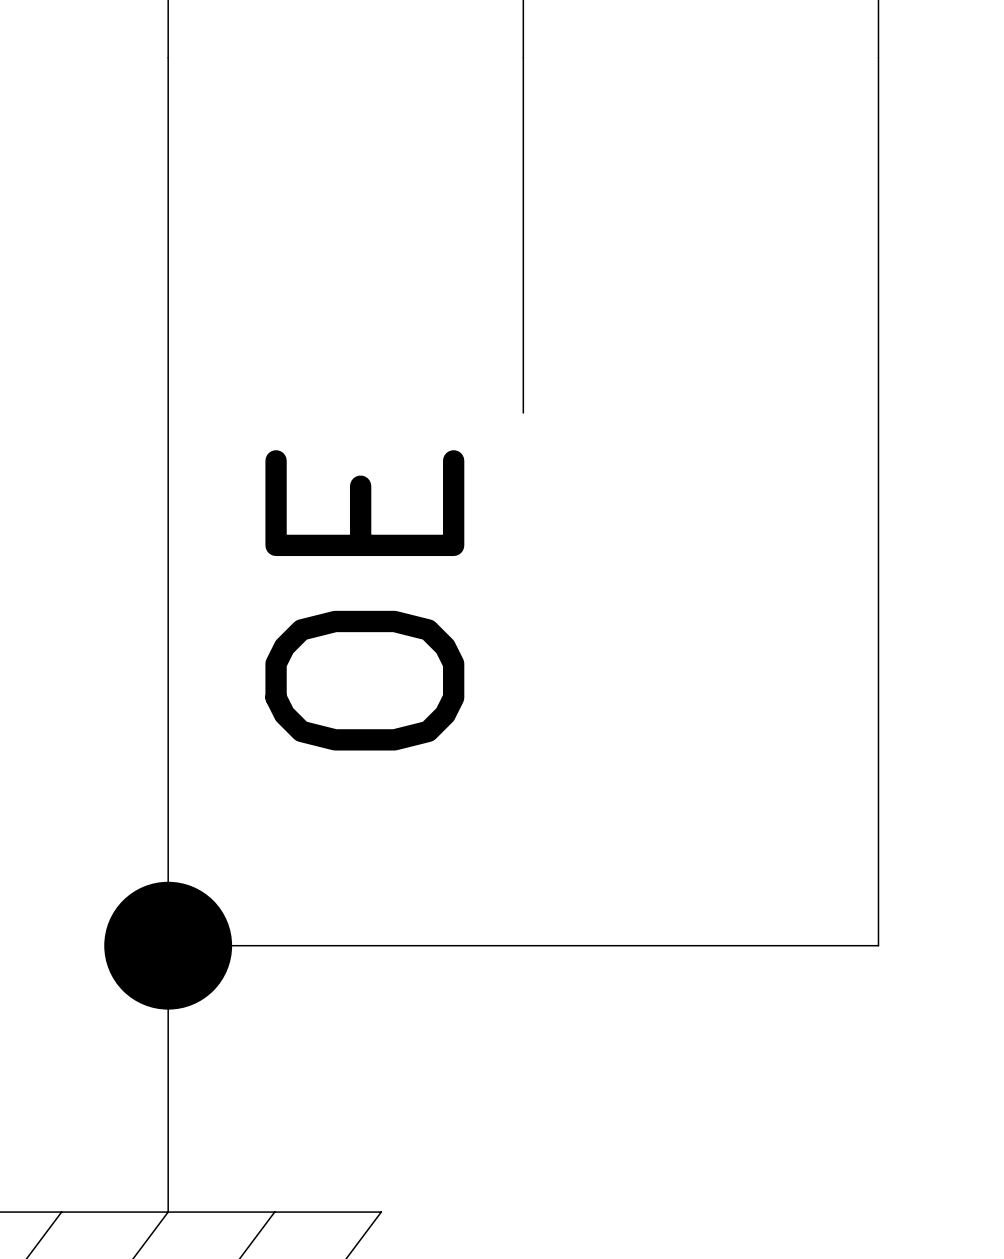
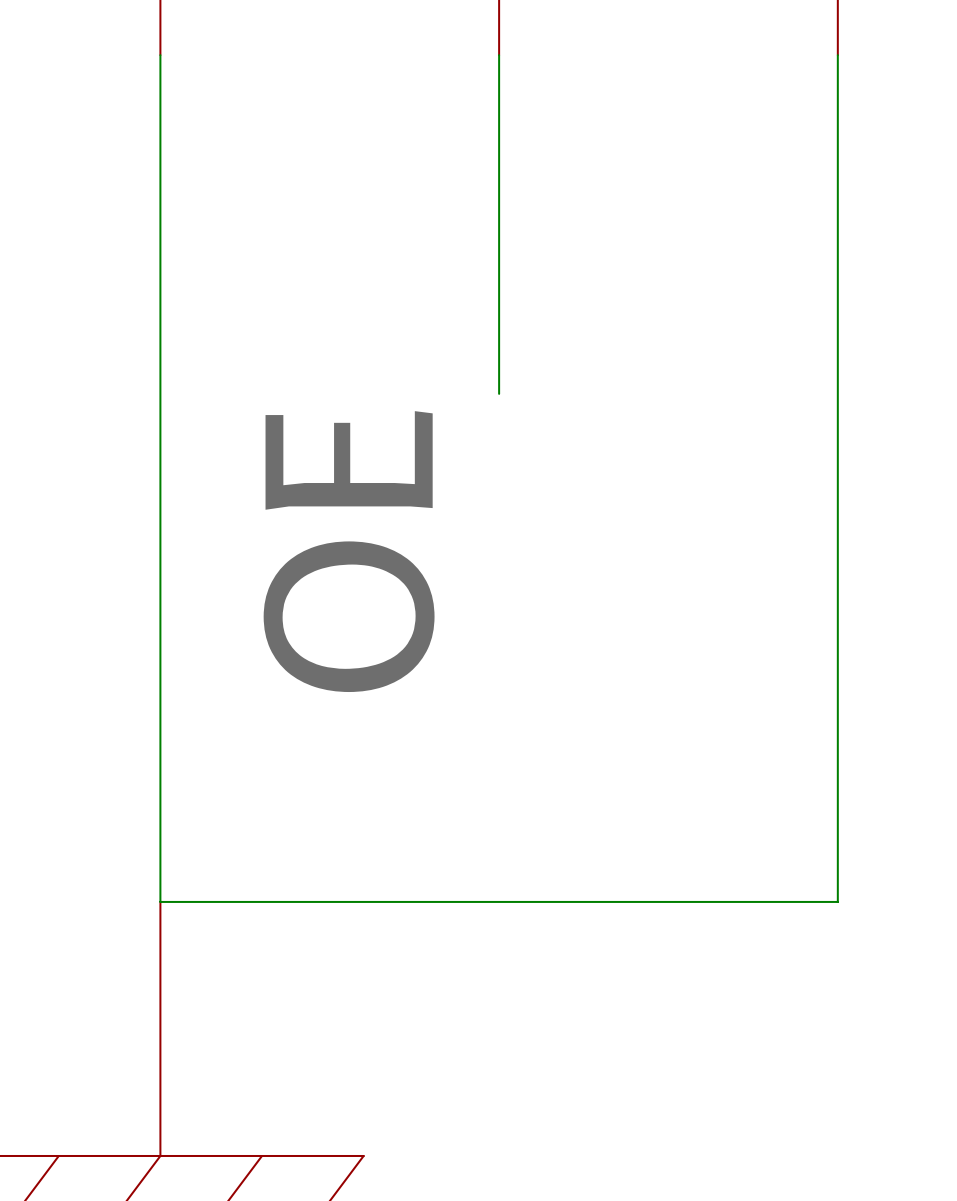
junction: (168, 945) -> none

